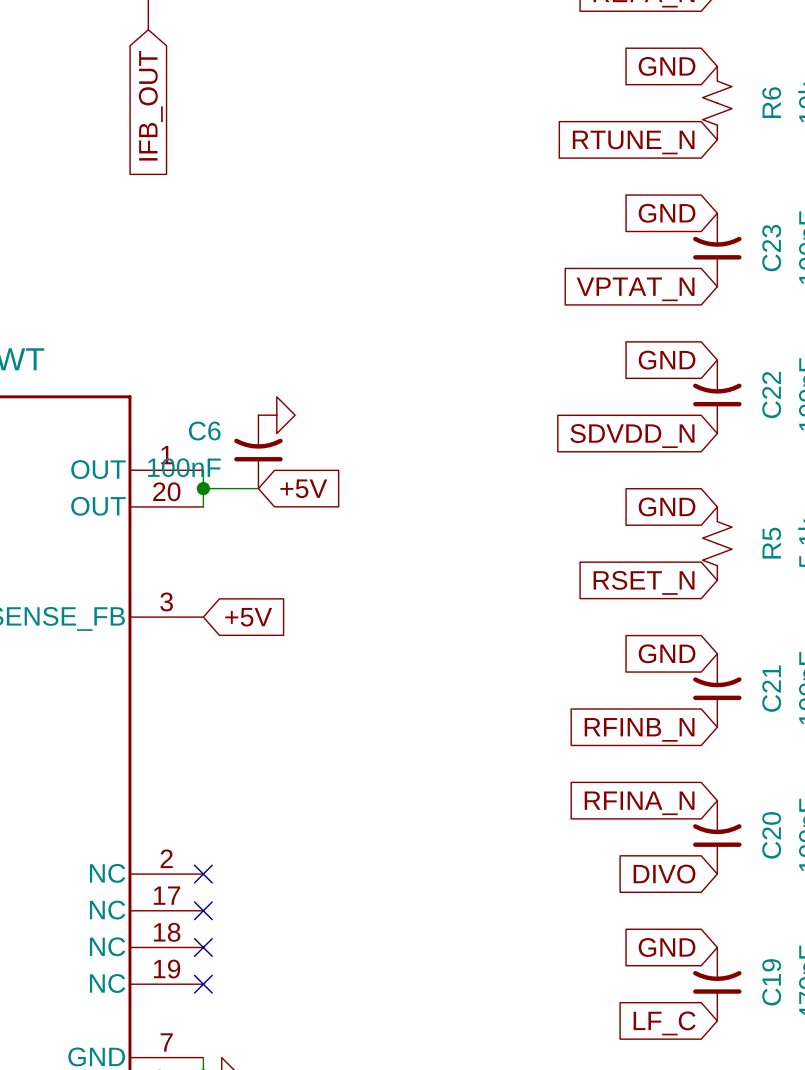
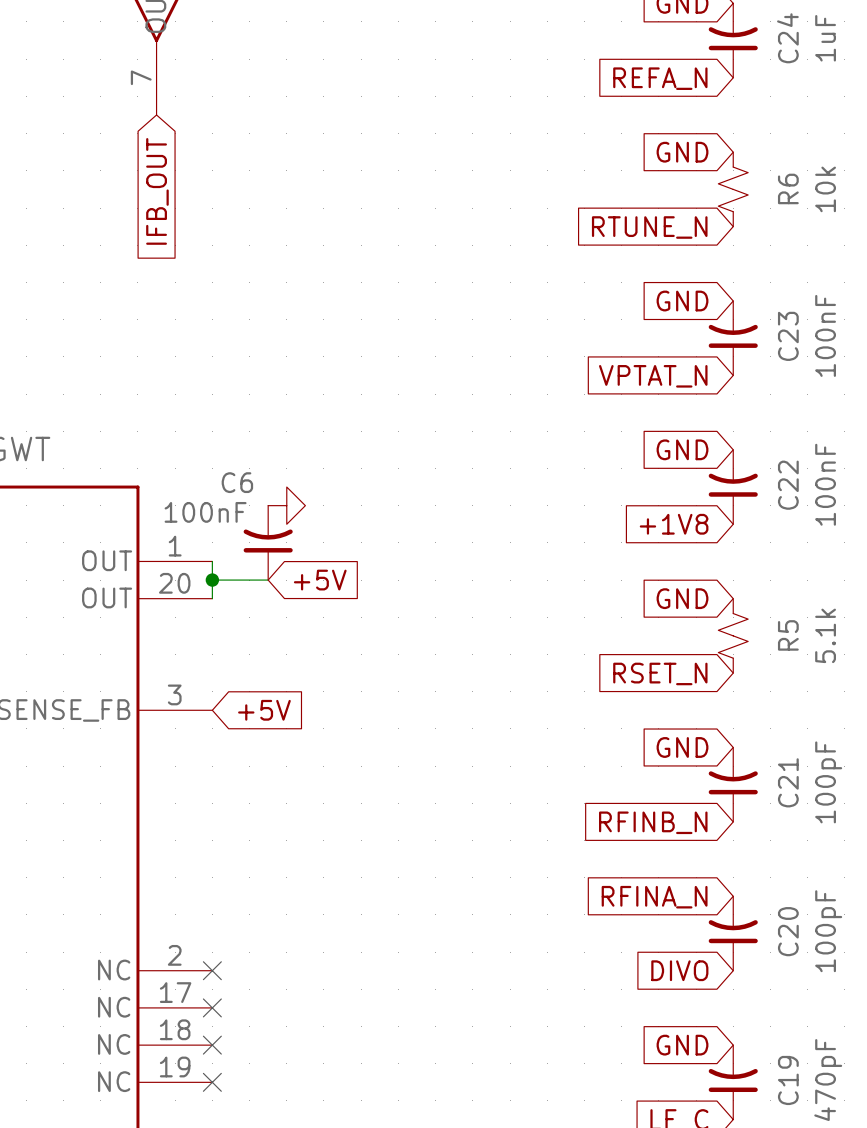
C6 name position: C6 (204, 431) -> C6 (237, 482)
global label: SDVDD_N (632, 436) -> +1V8 (674, 524)
C6 value position: 100nF (184, 467) -> 100nF (205, 512)

